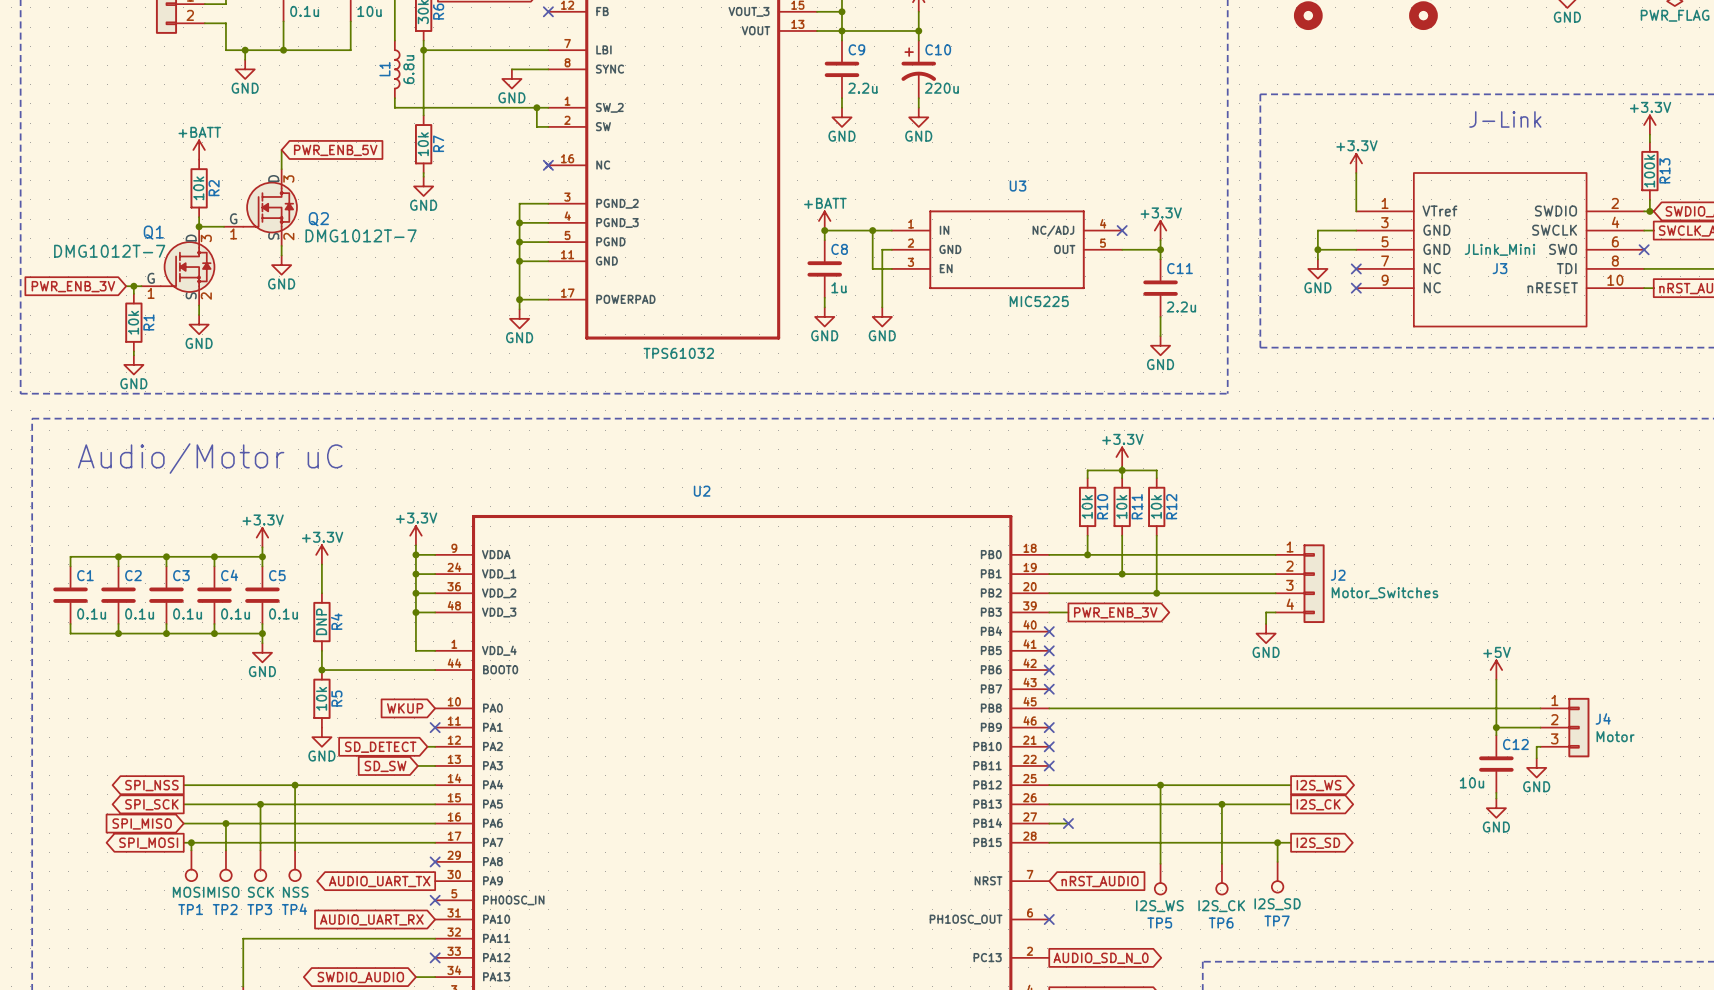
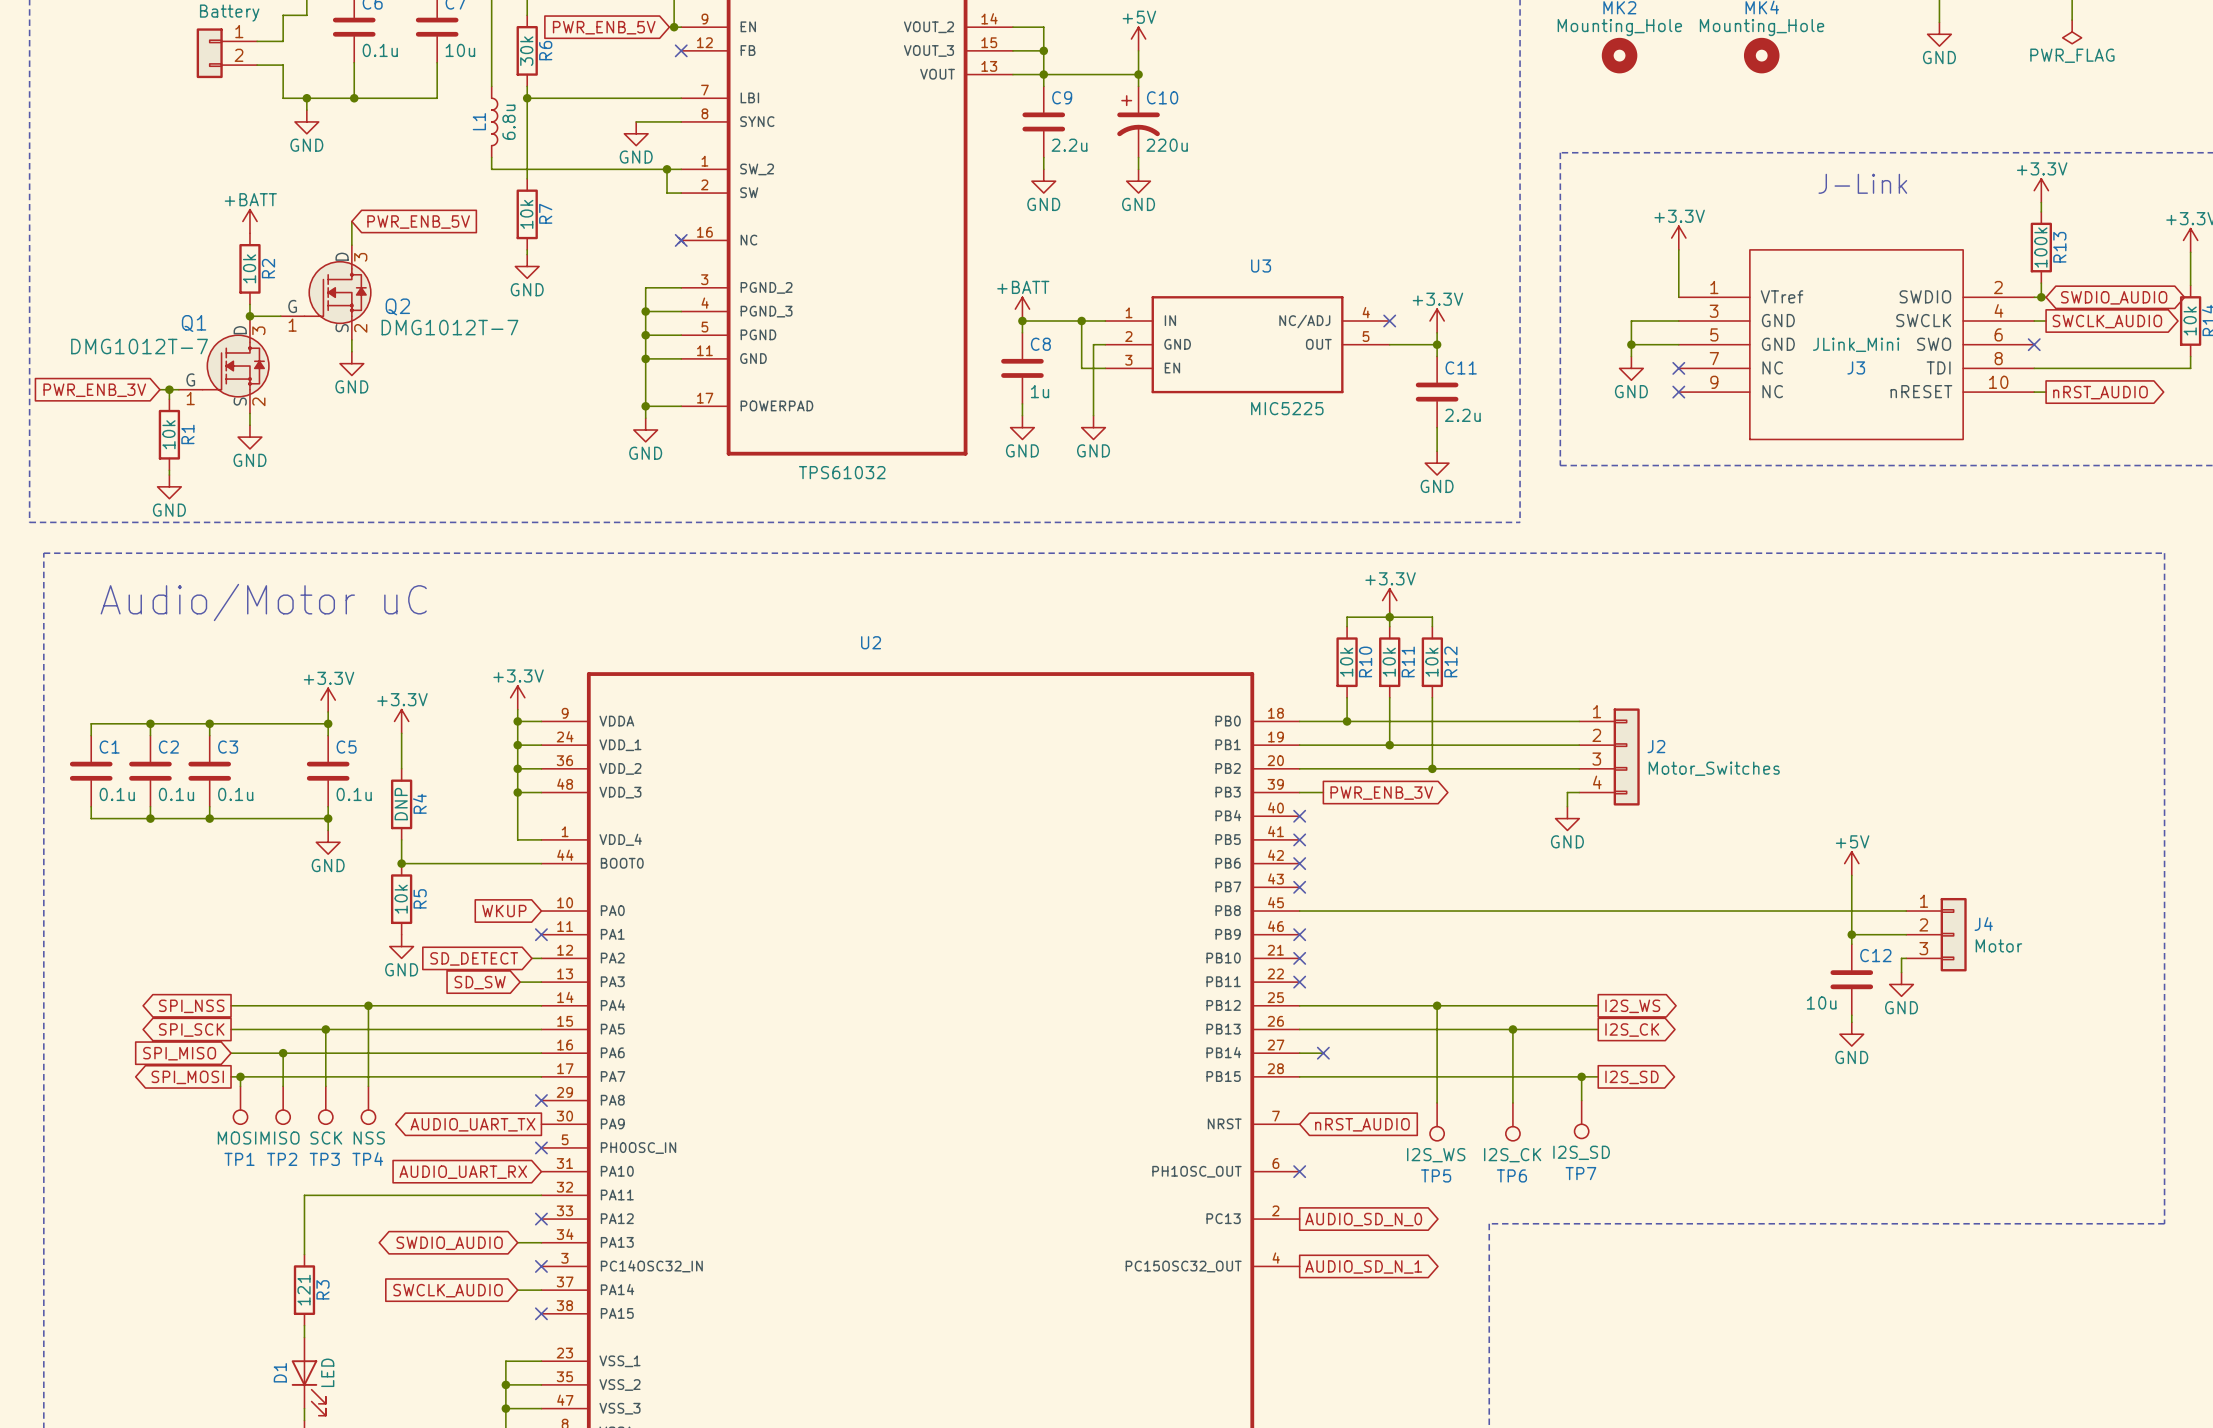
wire: (214, 556) (214, 566) -> none
junction: (214, 556) -> none
C4: 0.1u (214, 595) -> none
wire: (214, 623) (214, 633) -> none
junction: (214, 633) -> none

